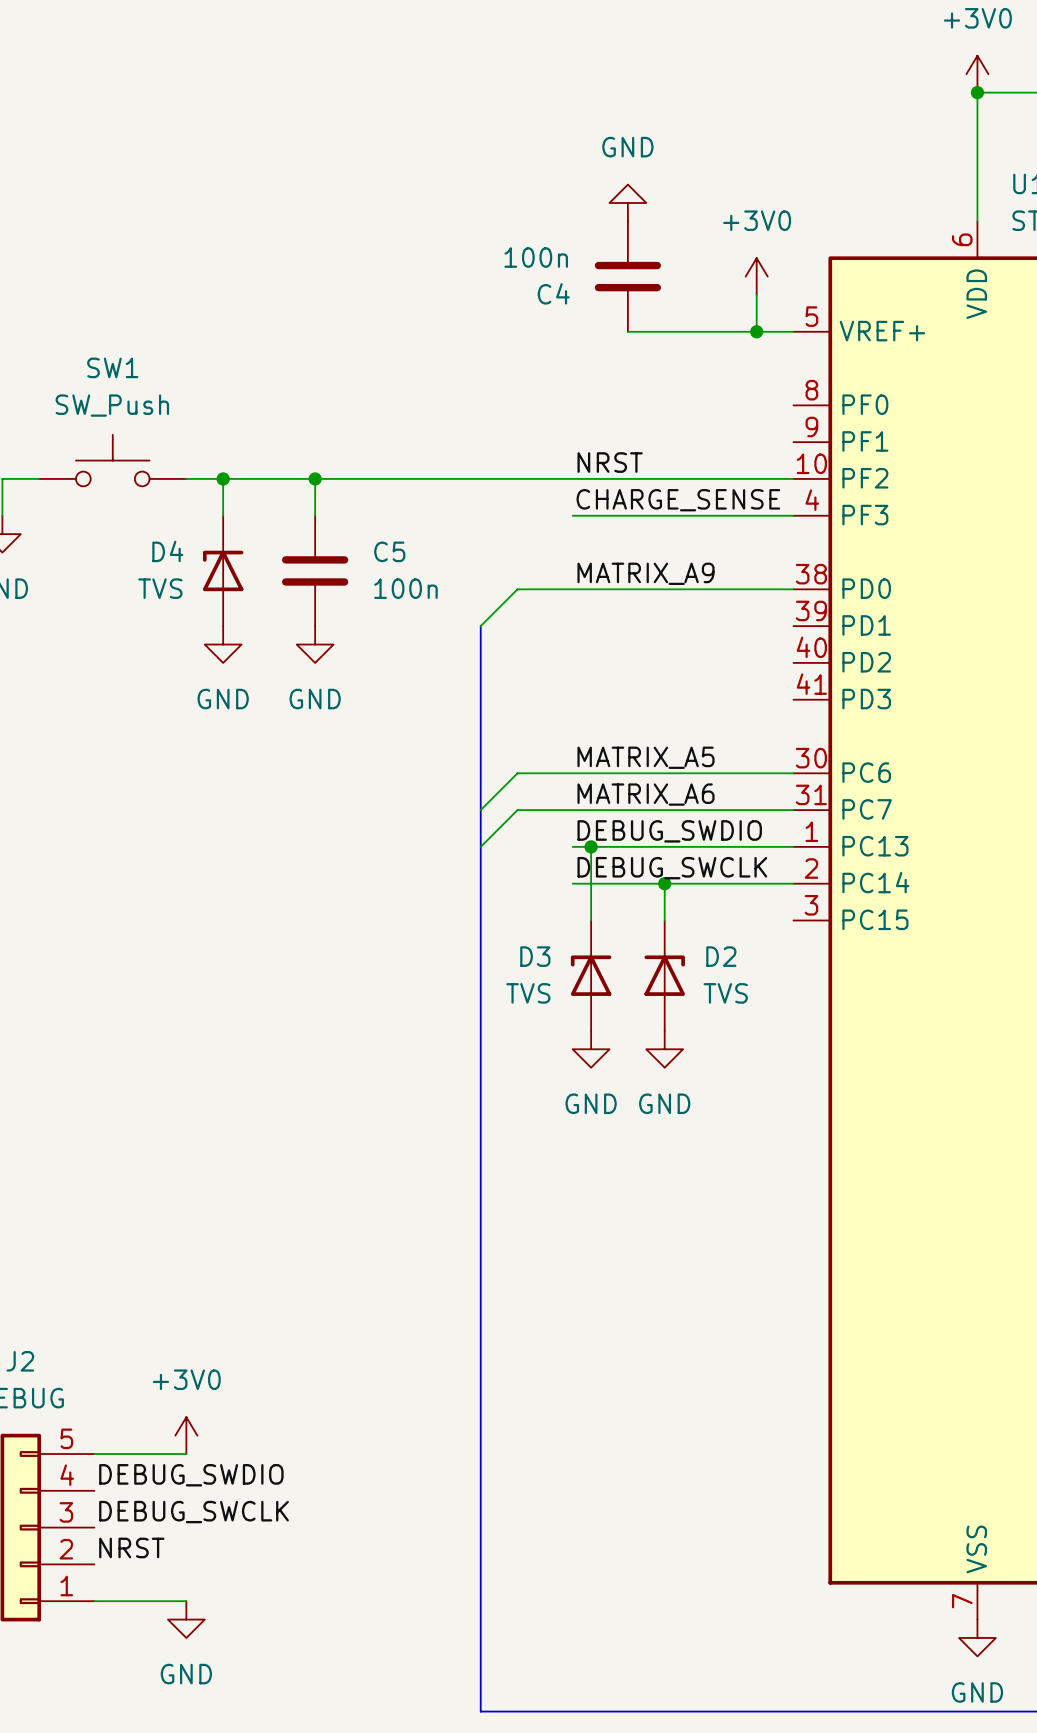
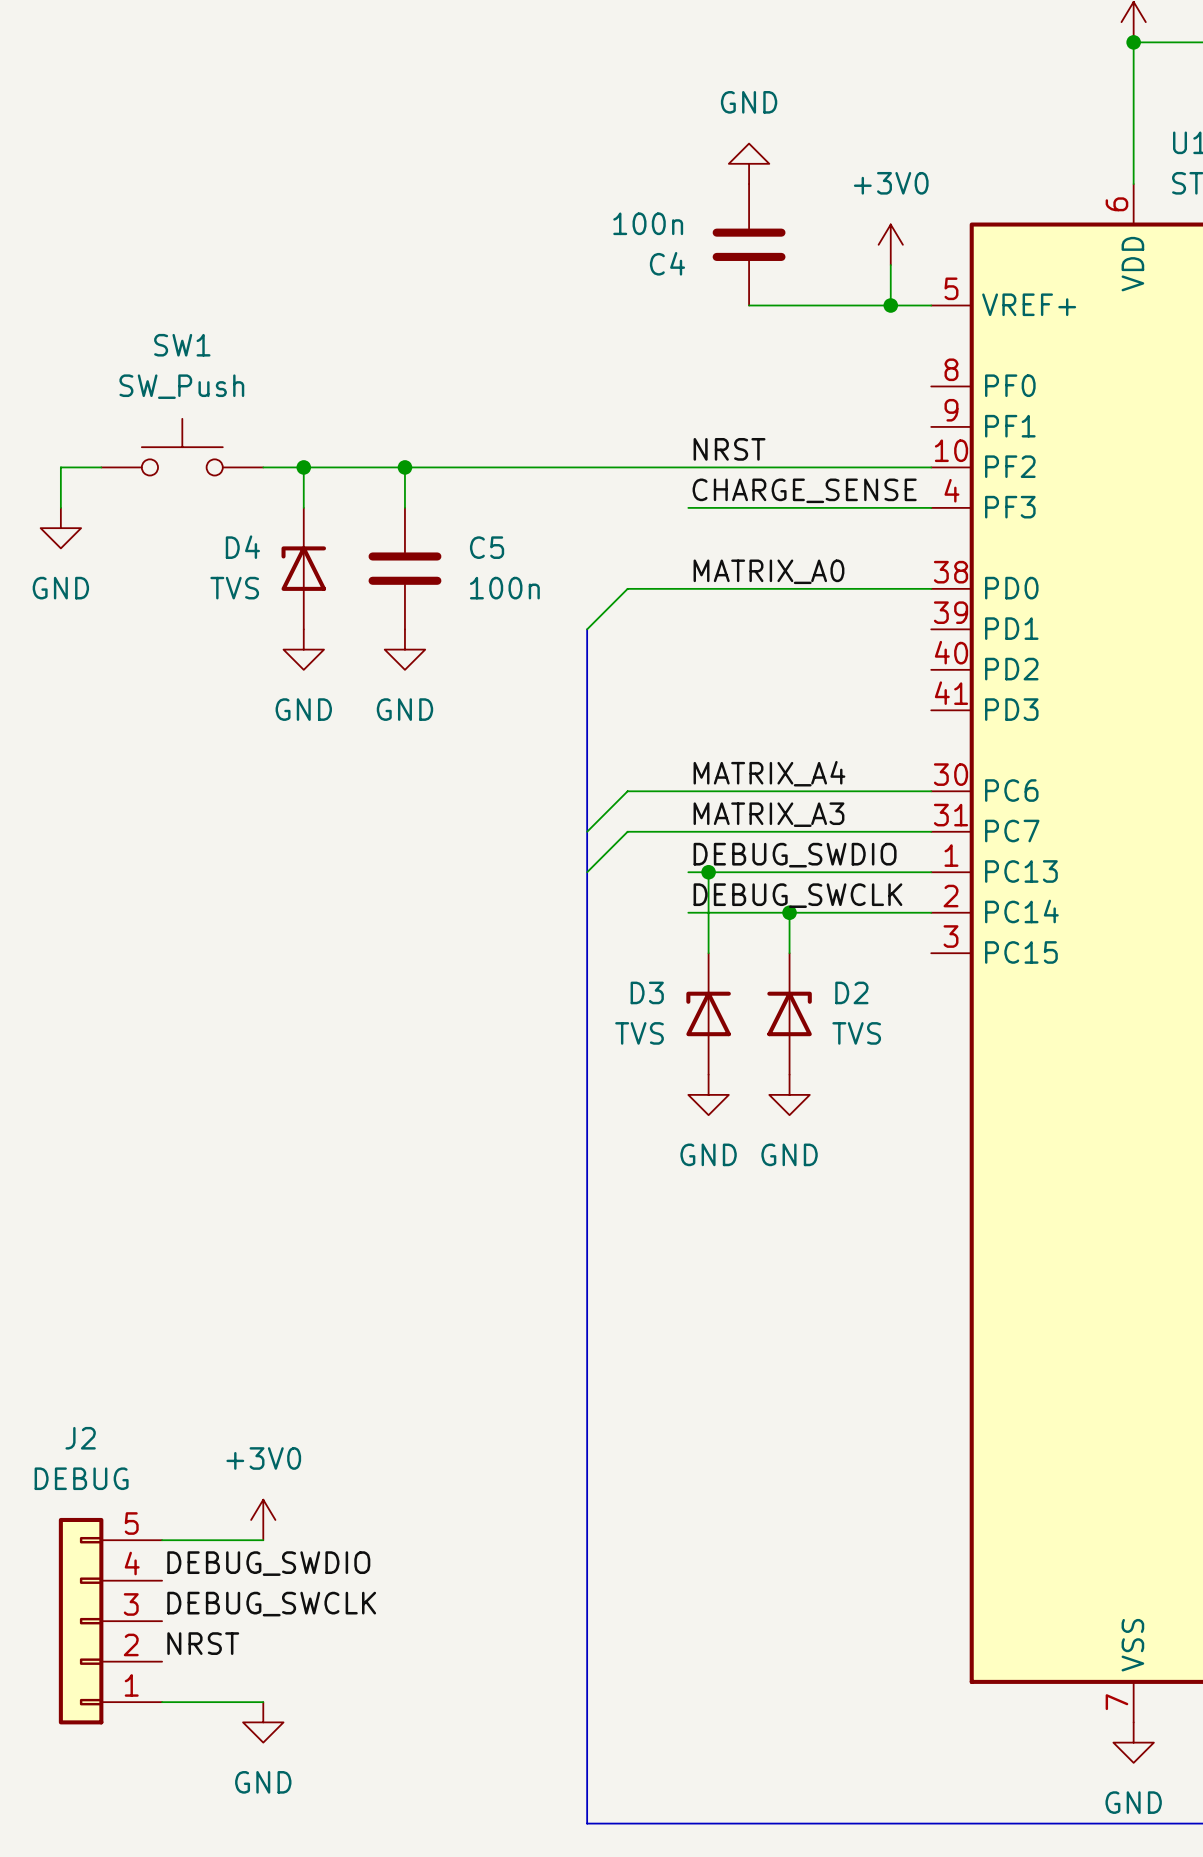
label: MATRIX_A9 (646, 573) -> MATRIX_A0 (768, 571)
label: MATRIX_A5 (646, 757) -> MATRIX_A4 (769, 773)
label: MATRIX_A6 (646, 794) -> MATRIX_A3 (768, 814)

